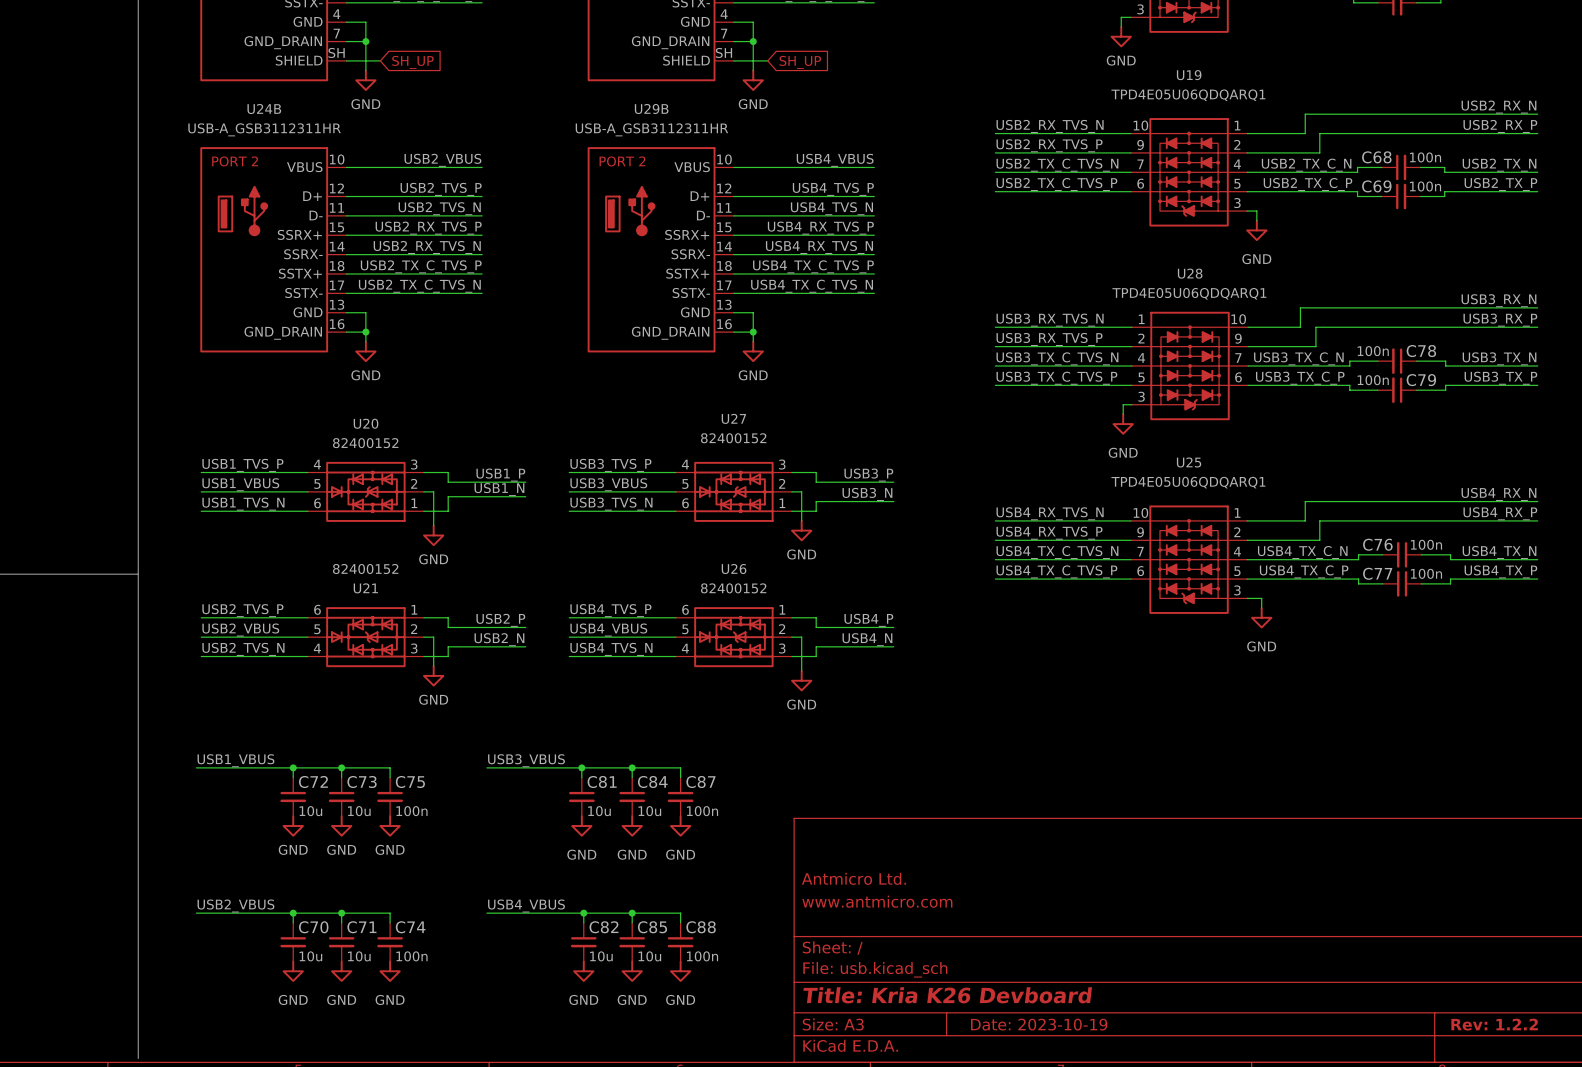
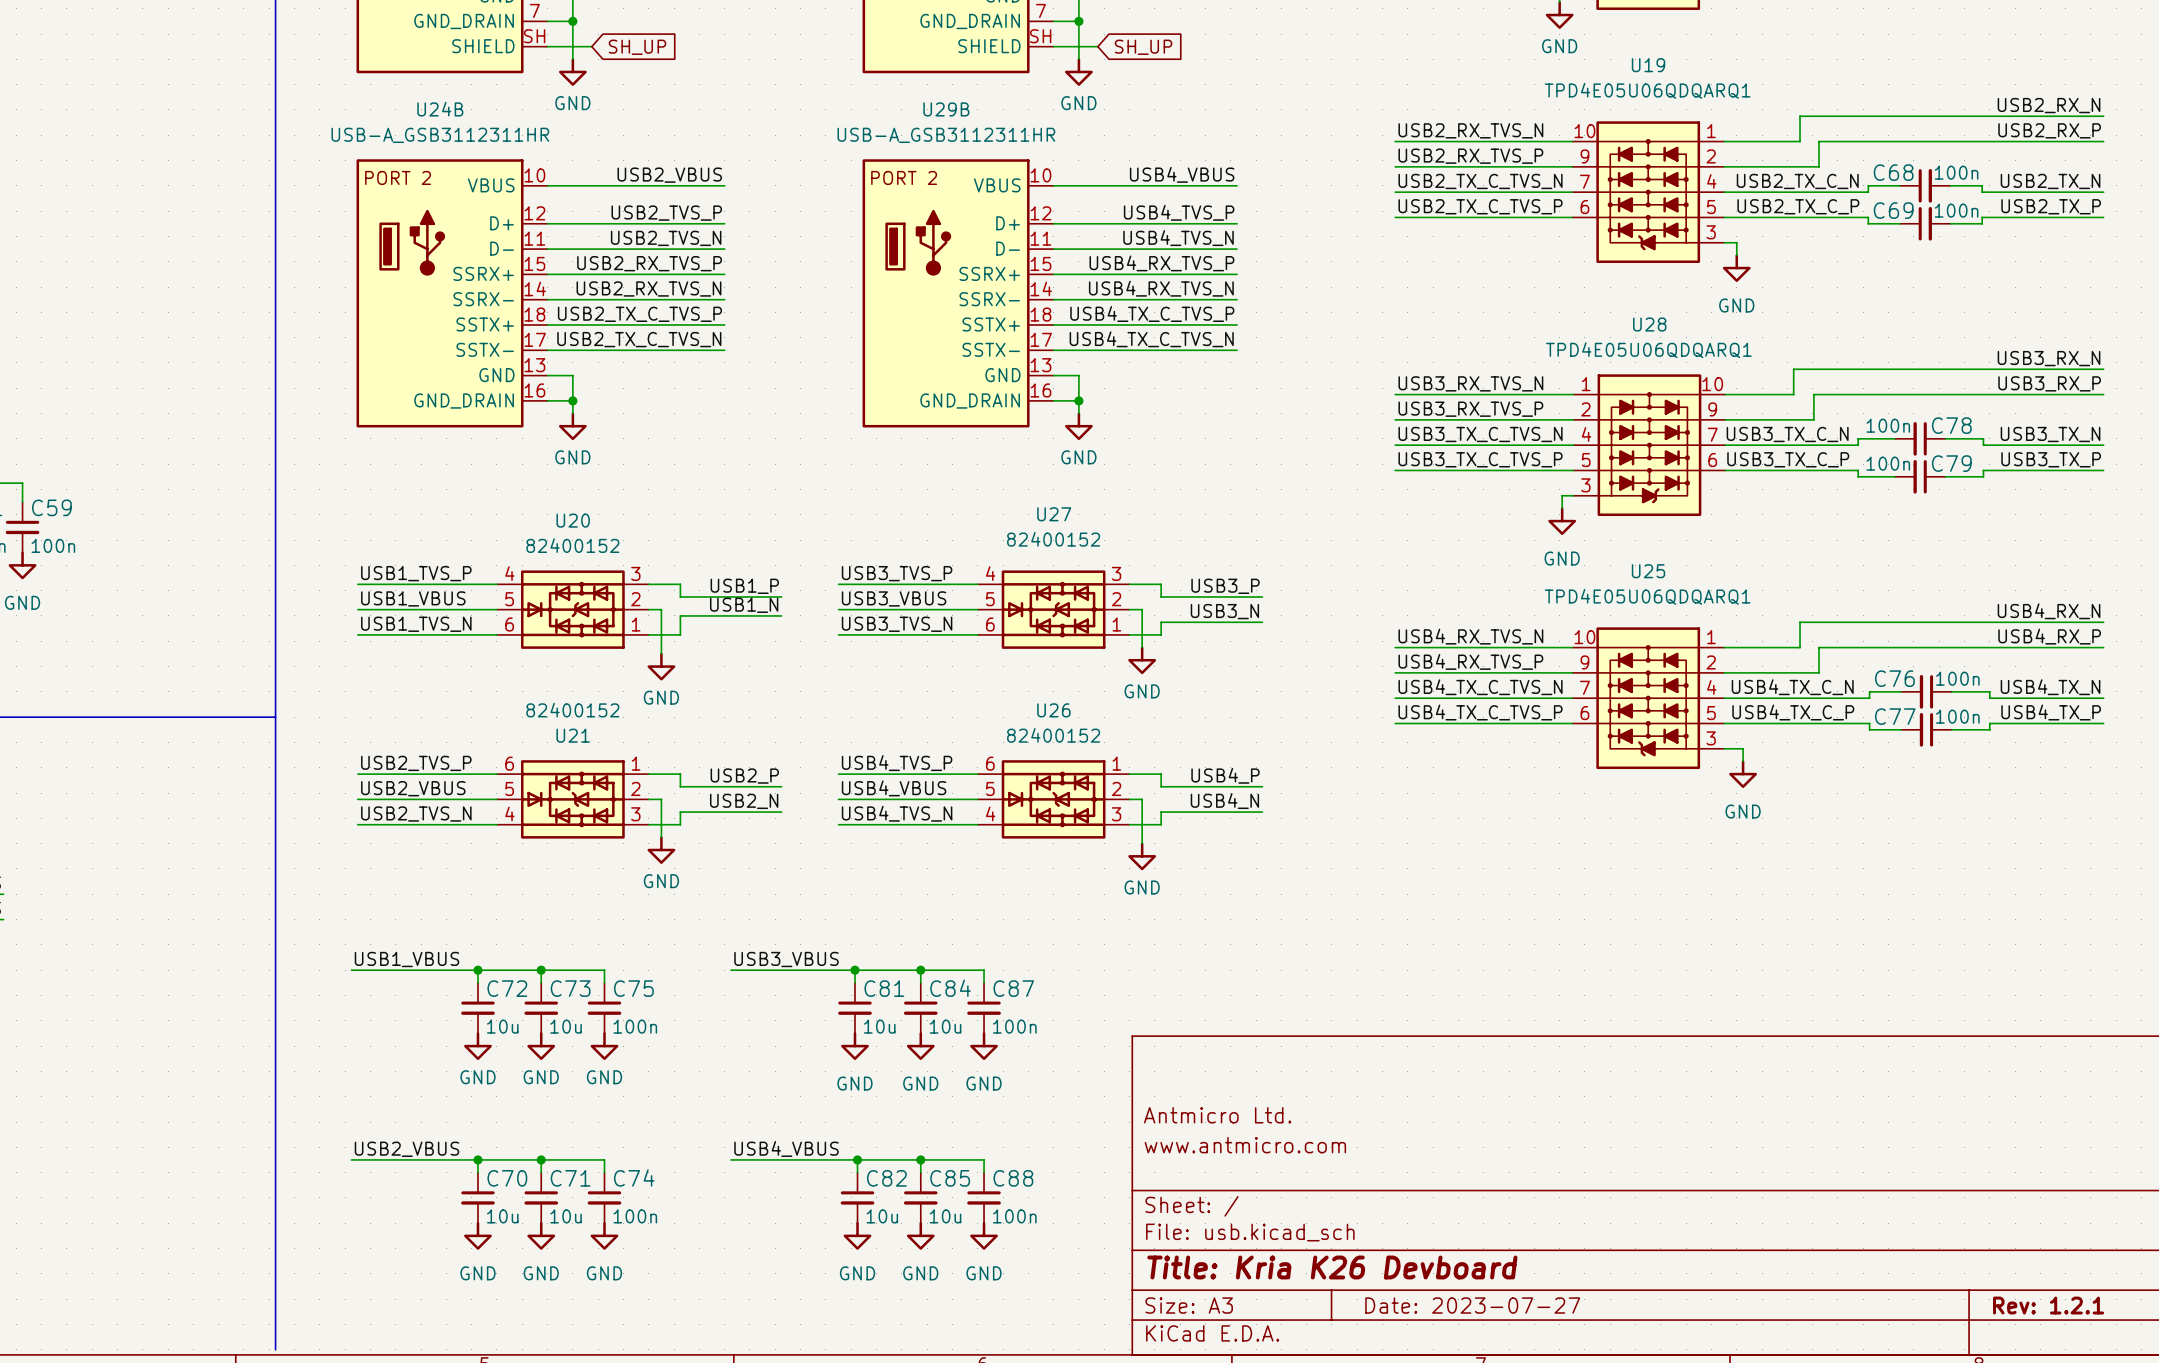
title block: Date: 2023-10-19 (1039, 1024) -> Date: 2023-07-27 (1472, 1305)
title block: Rev: 1.2.2 (1494, 1024) -> Rev: 1.2.1 (2048, 1305)

